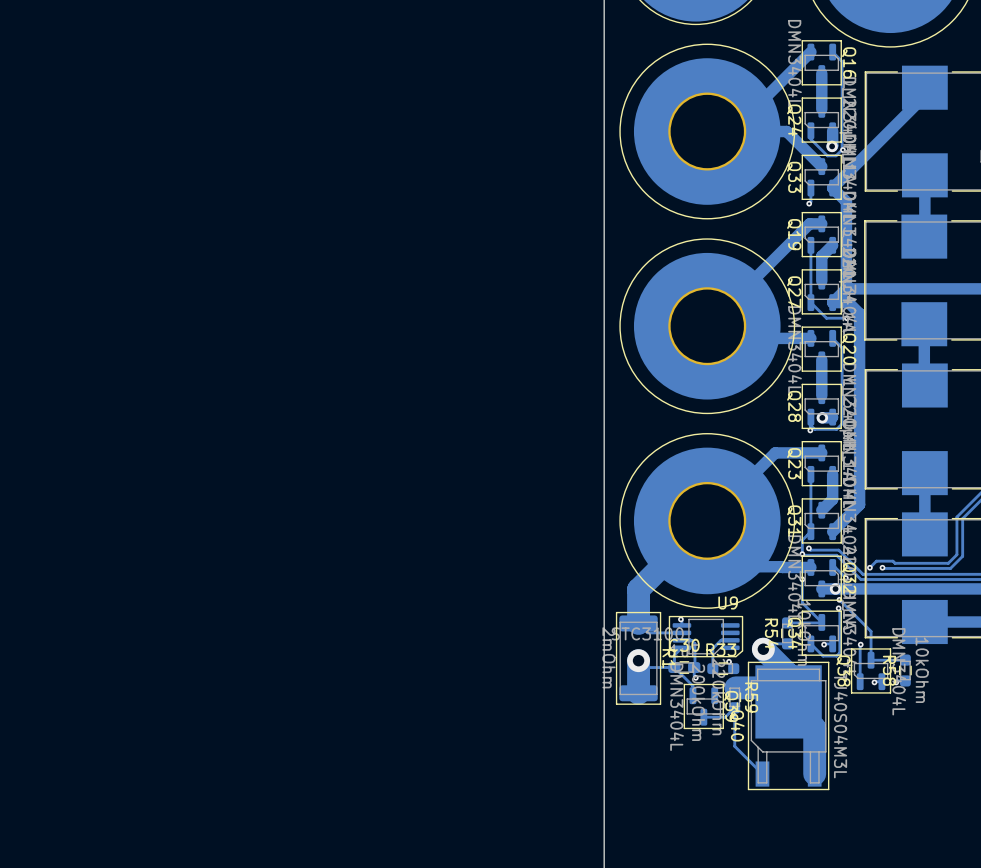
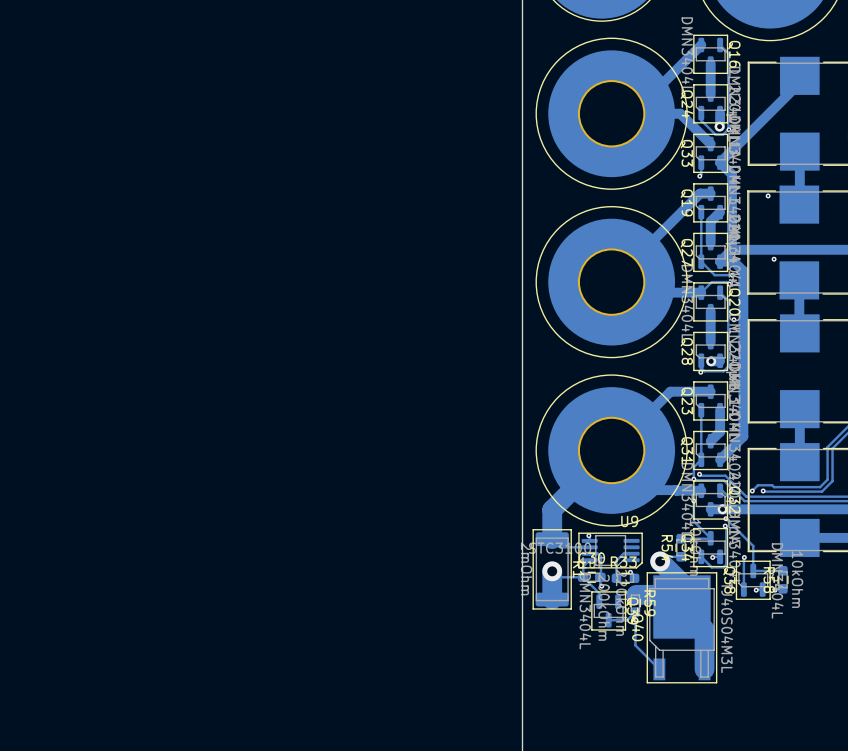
via: none -> (768, 195)
via: none -> (774, 259)
track: none -> (729, 284) (727, 282) (711, 282) (701, 292)
via: none -> (729, 284)
via: none -> (733, 319)

